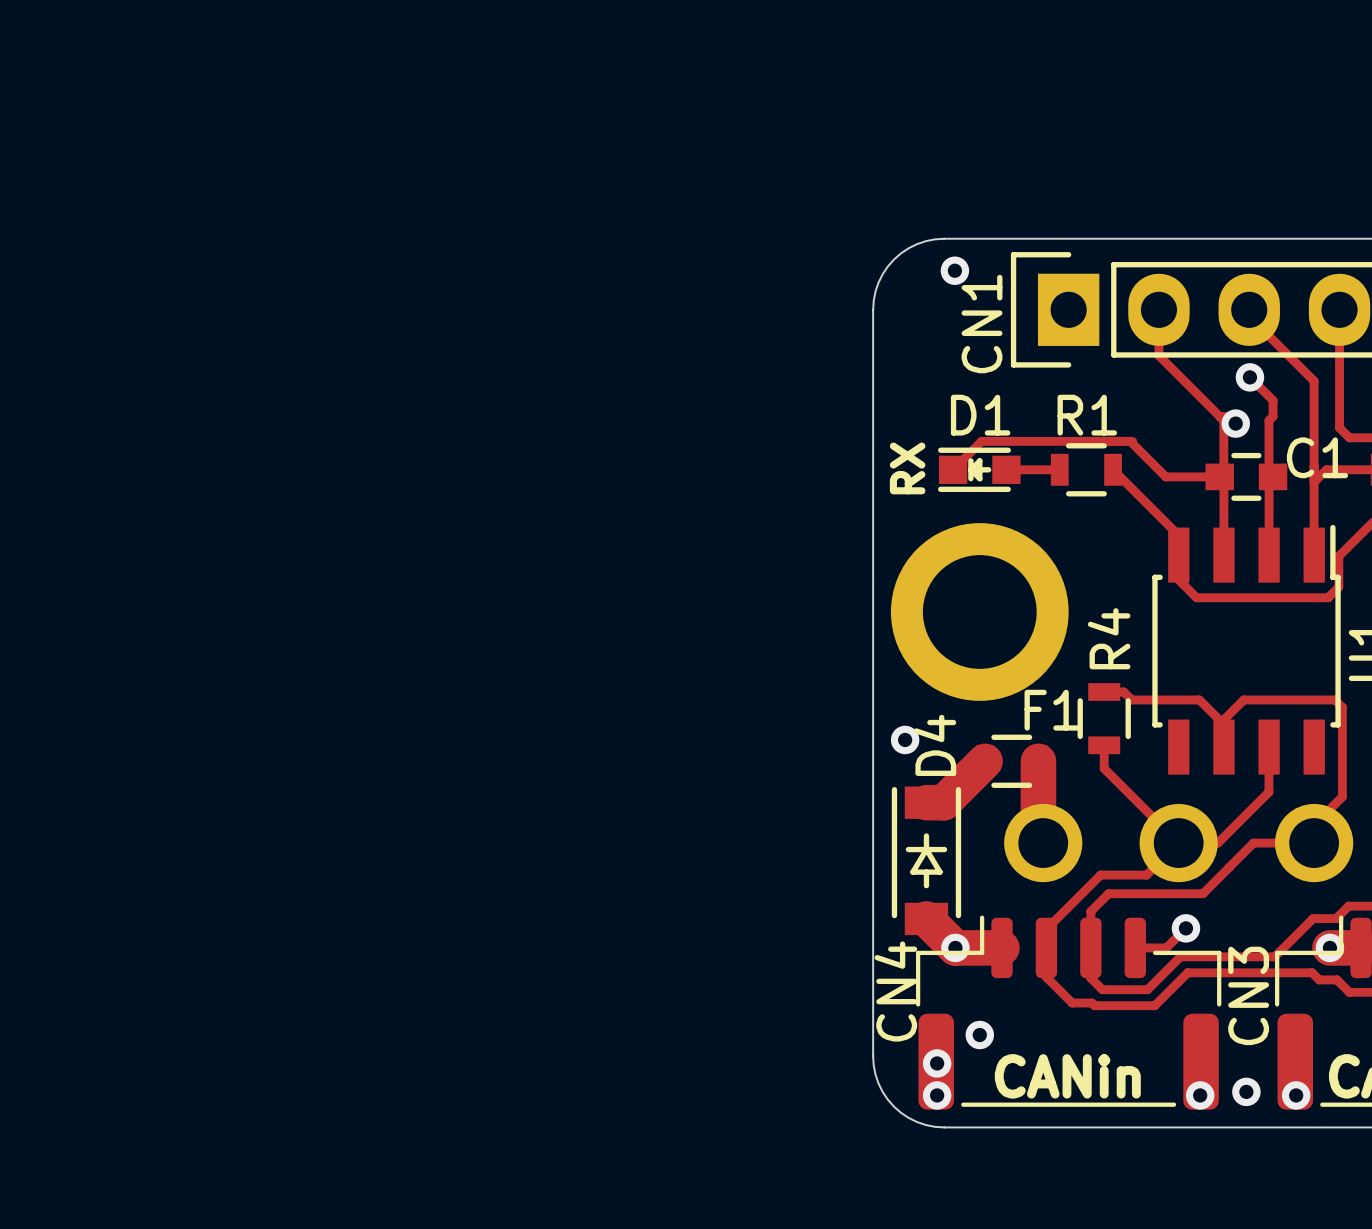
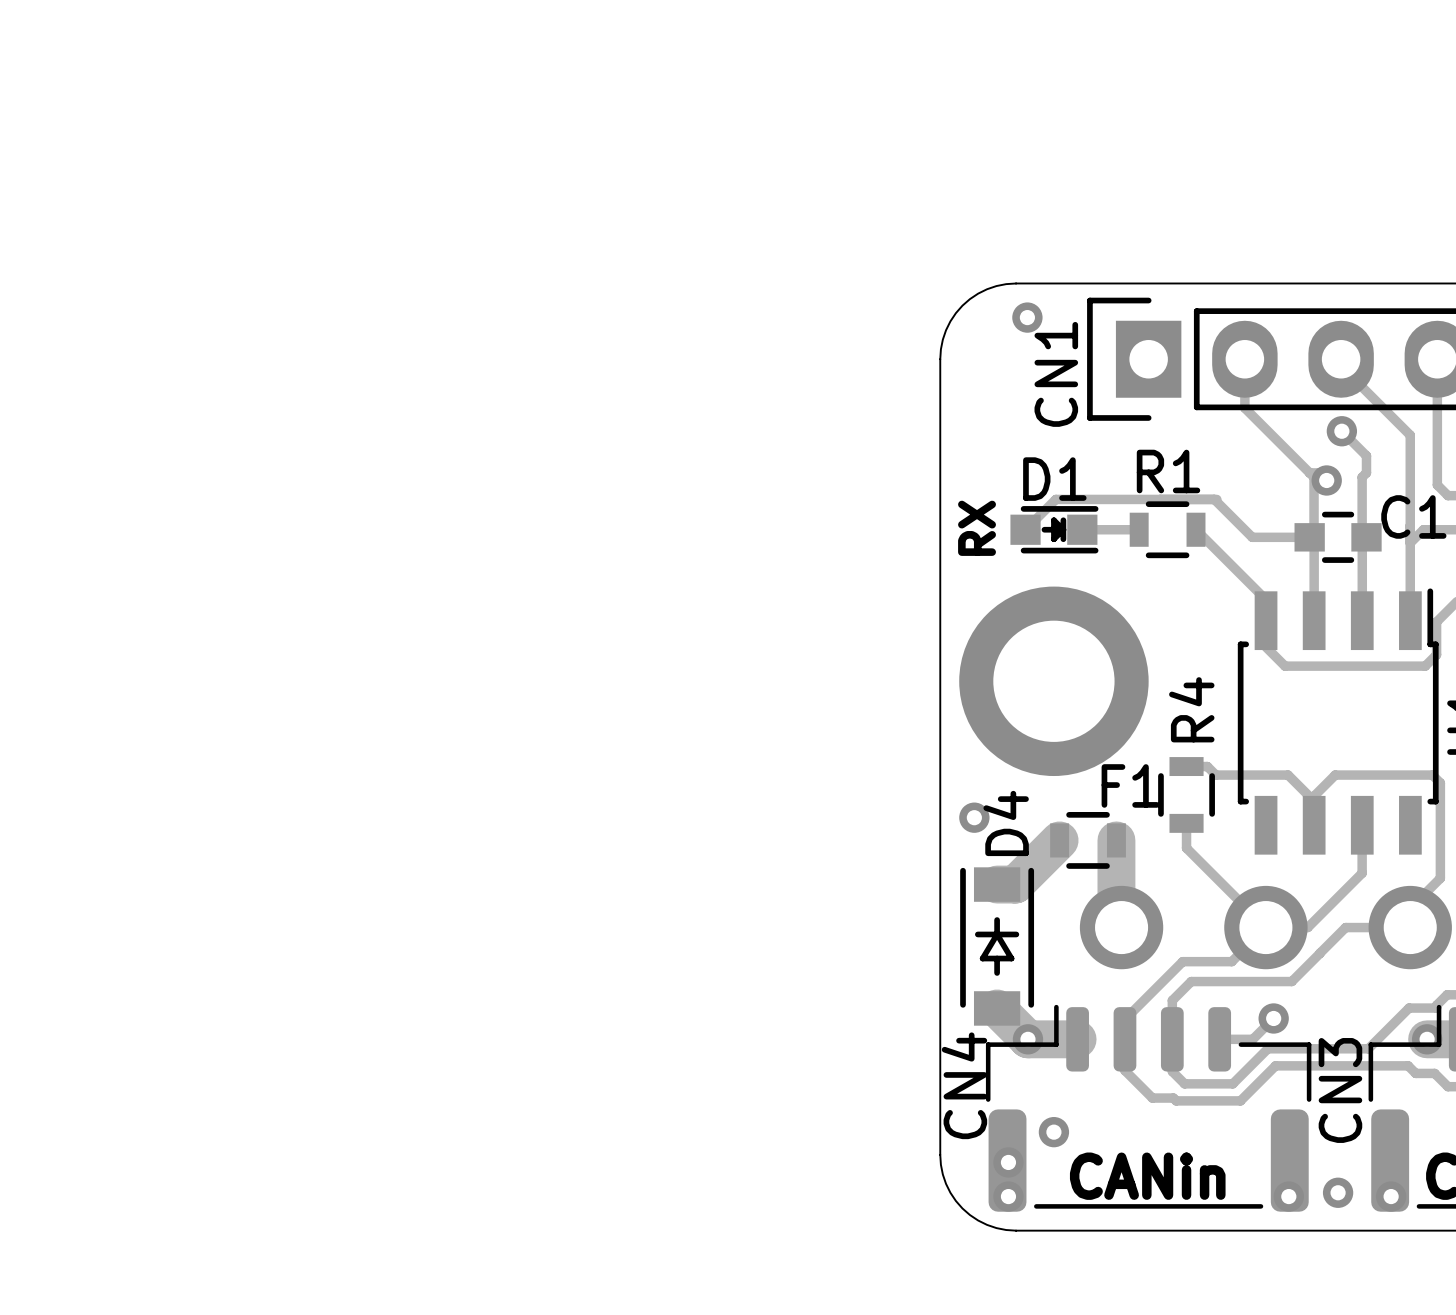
D1 rotation: 0° (979, 469) -> 180° (1054, 529)

